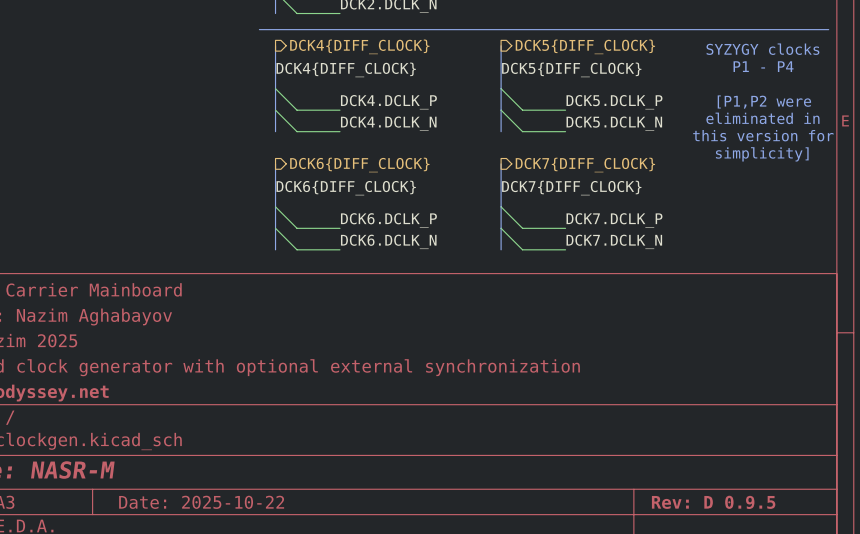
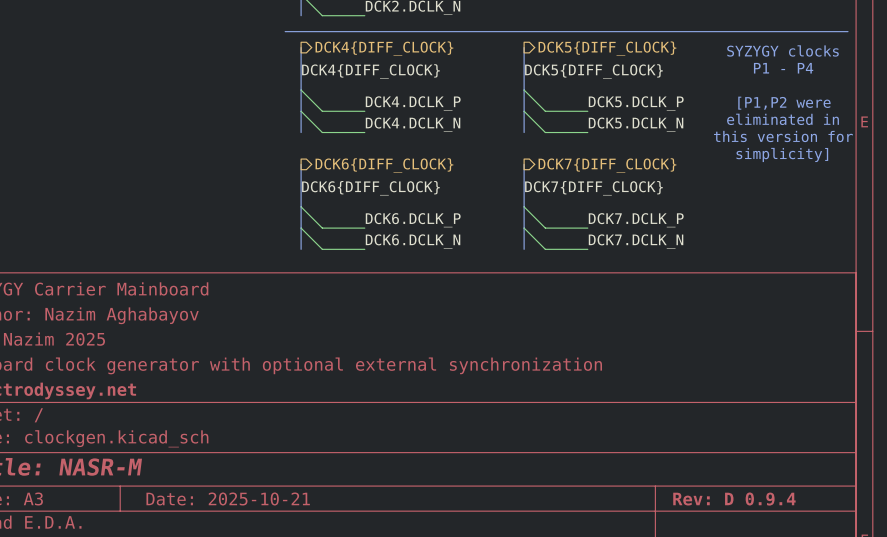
title block: Date: 2025-10-22 (201, 502) -> Date: 2025-10-21 (228, 498)
title block: Rev: D 0.9.5 (713, 502) -> Rev: D 0.9.4 (734, 499)

